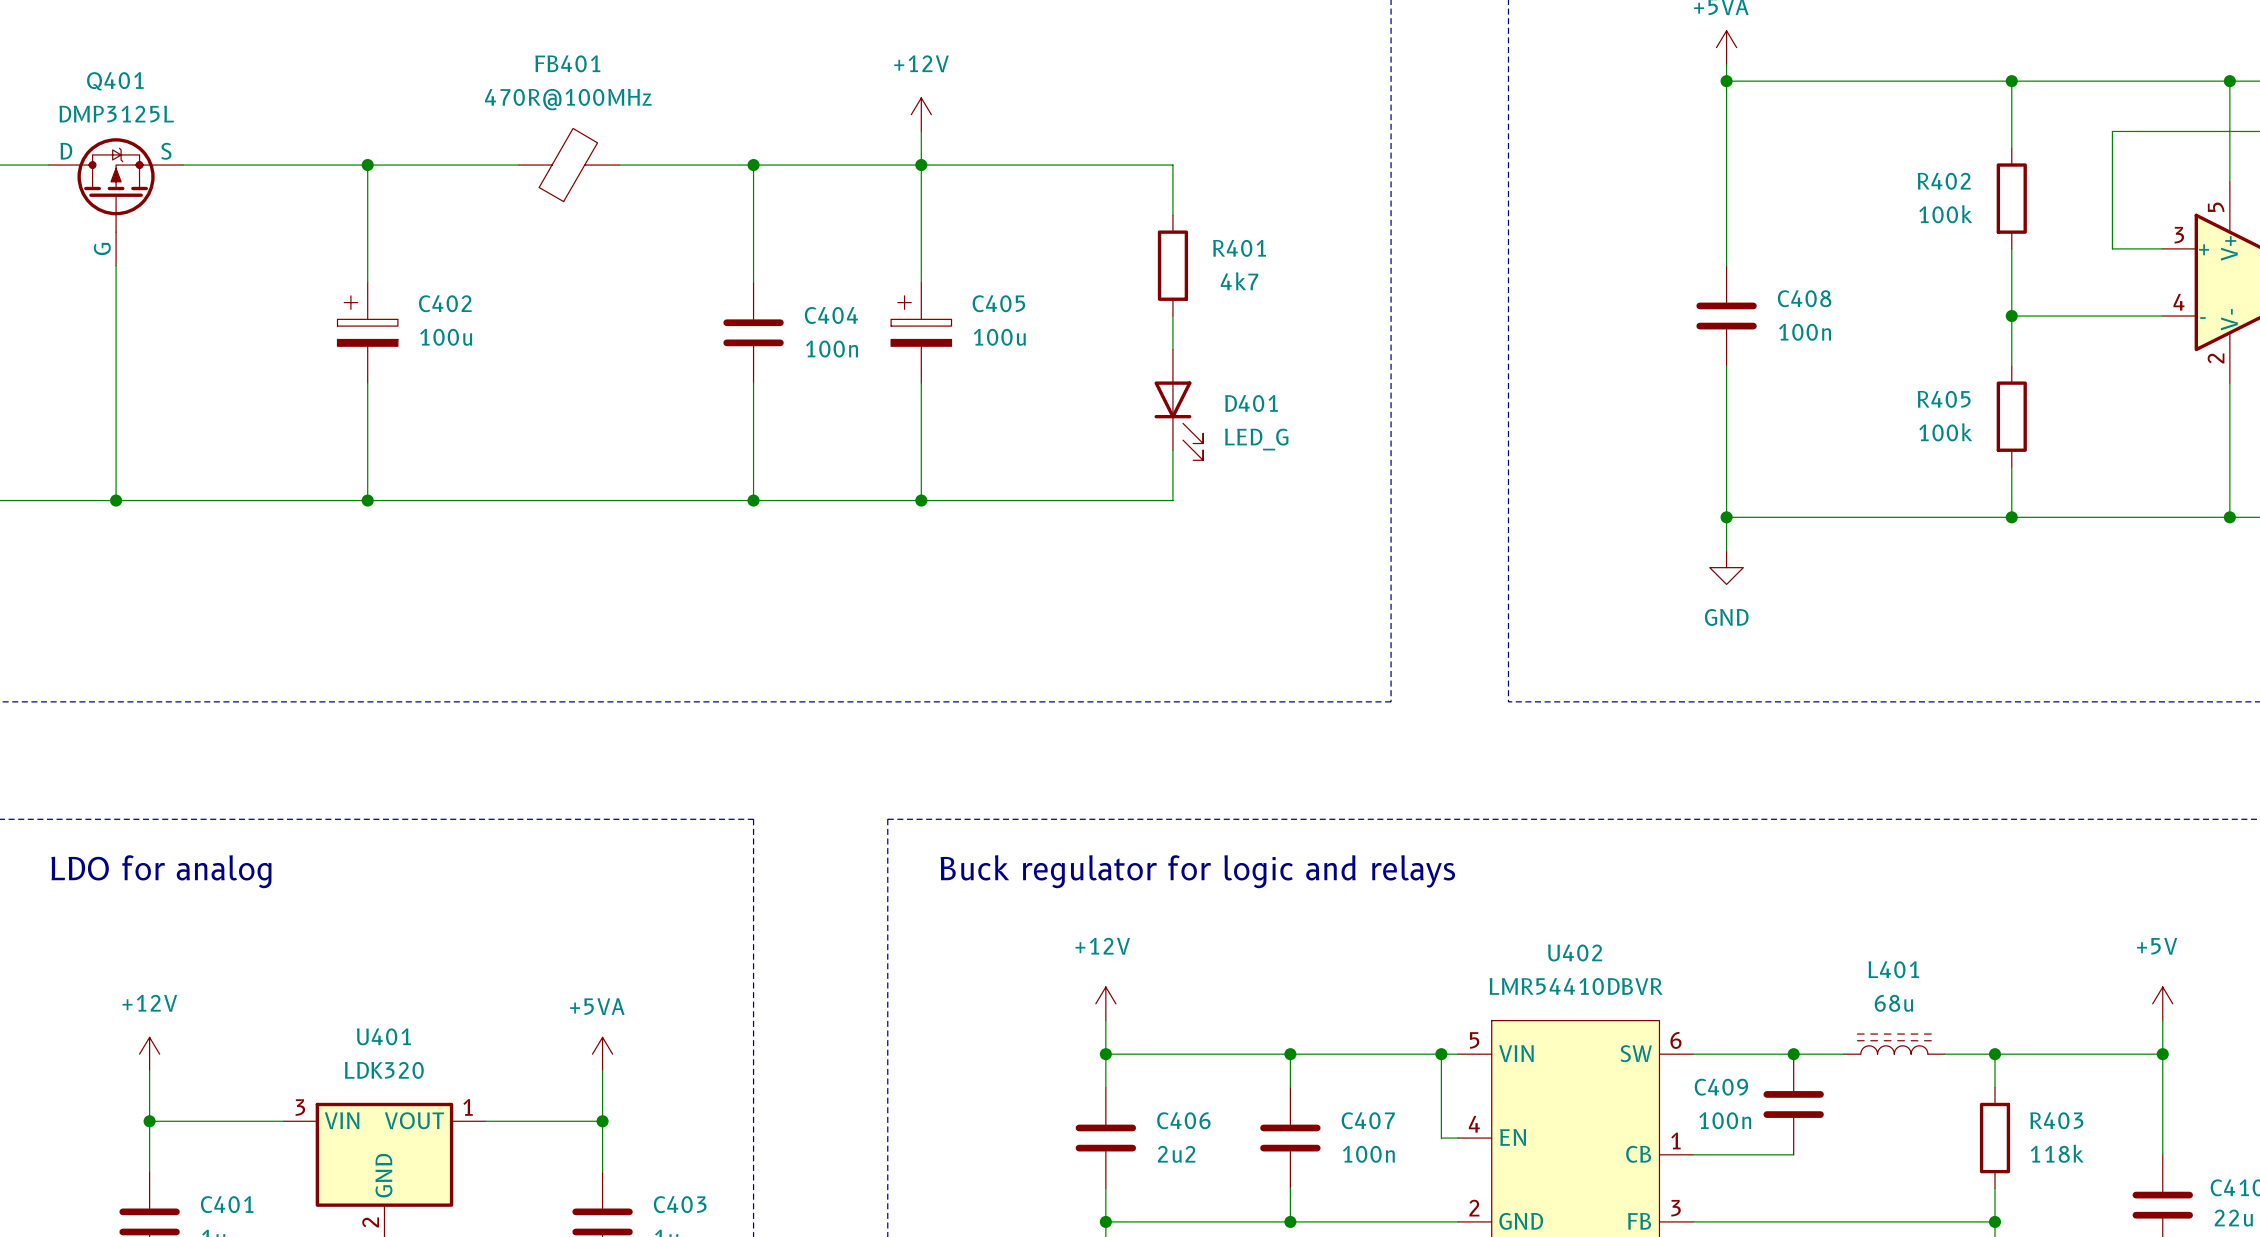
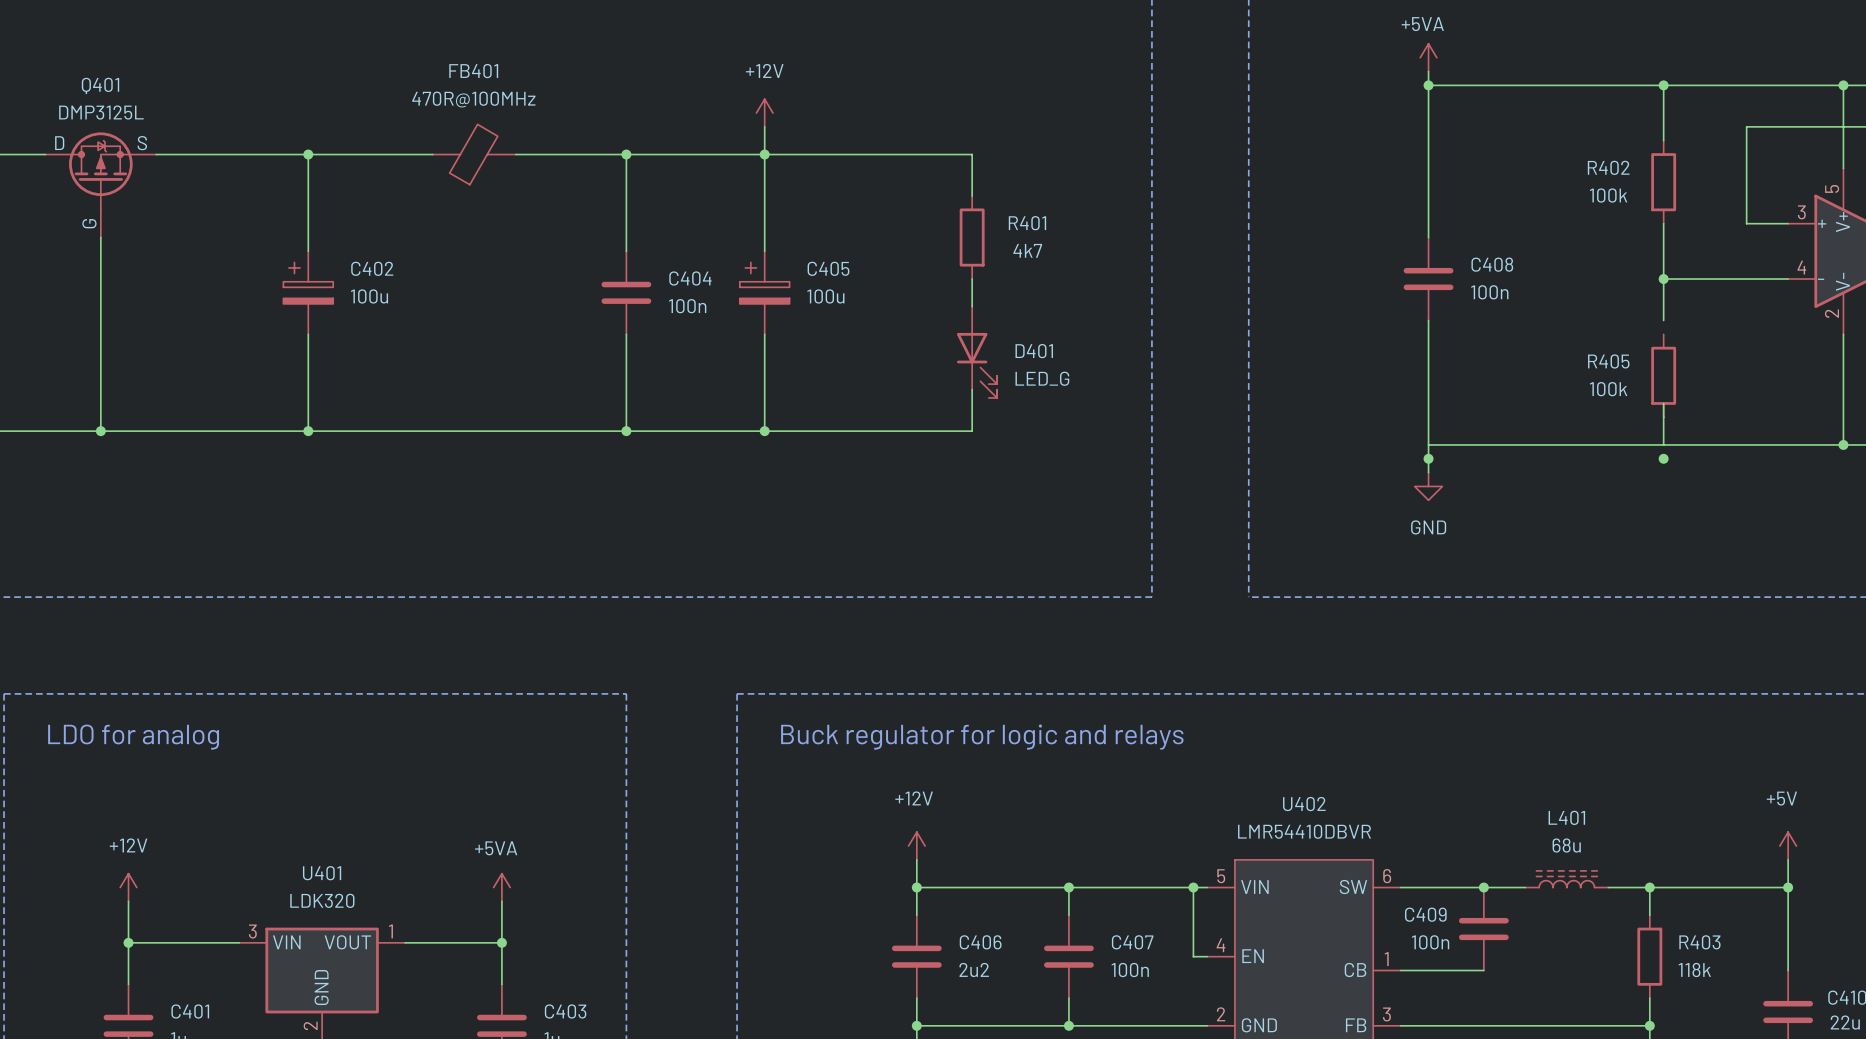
R405 position: (2011, 416) -> (1663, 375)
junction position: (1726, 517) -> (1428, 458)
junction position: (2011, 517) -> (1663, 458)

